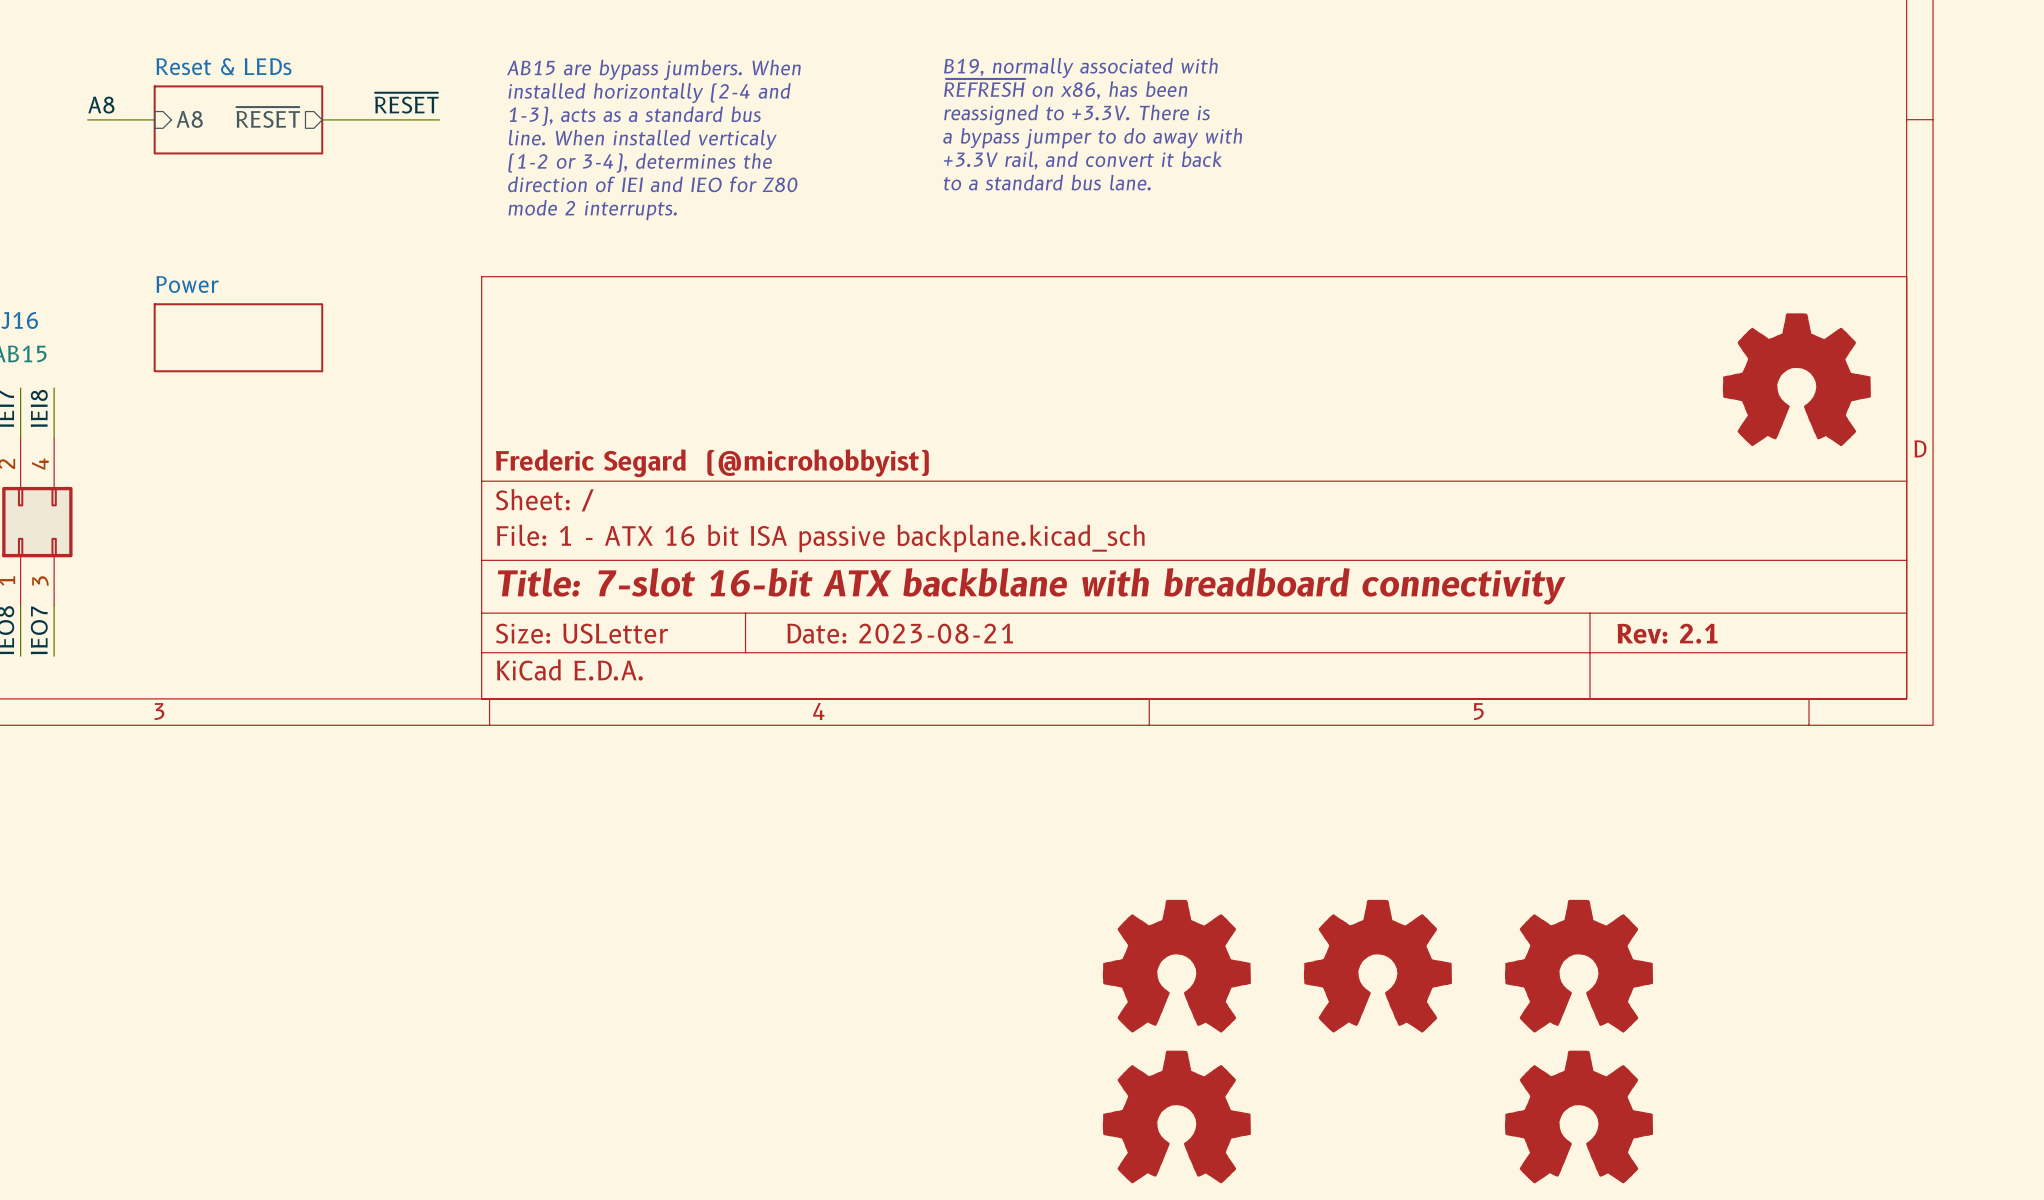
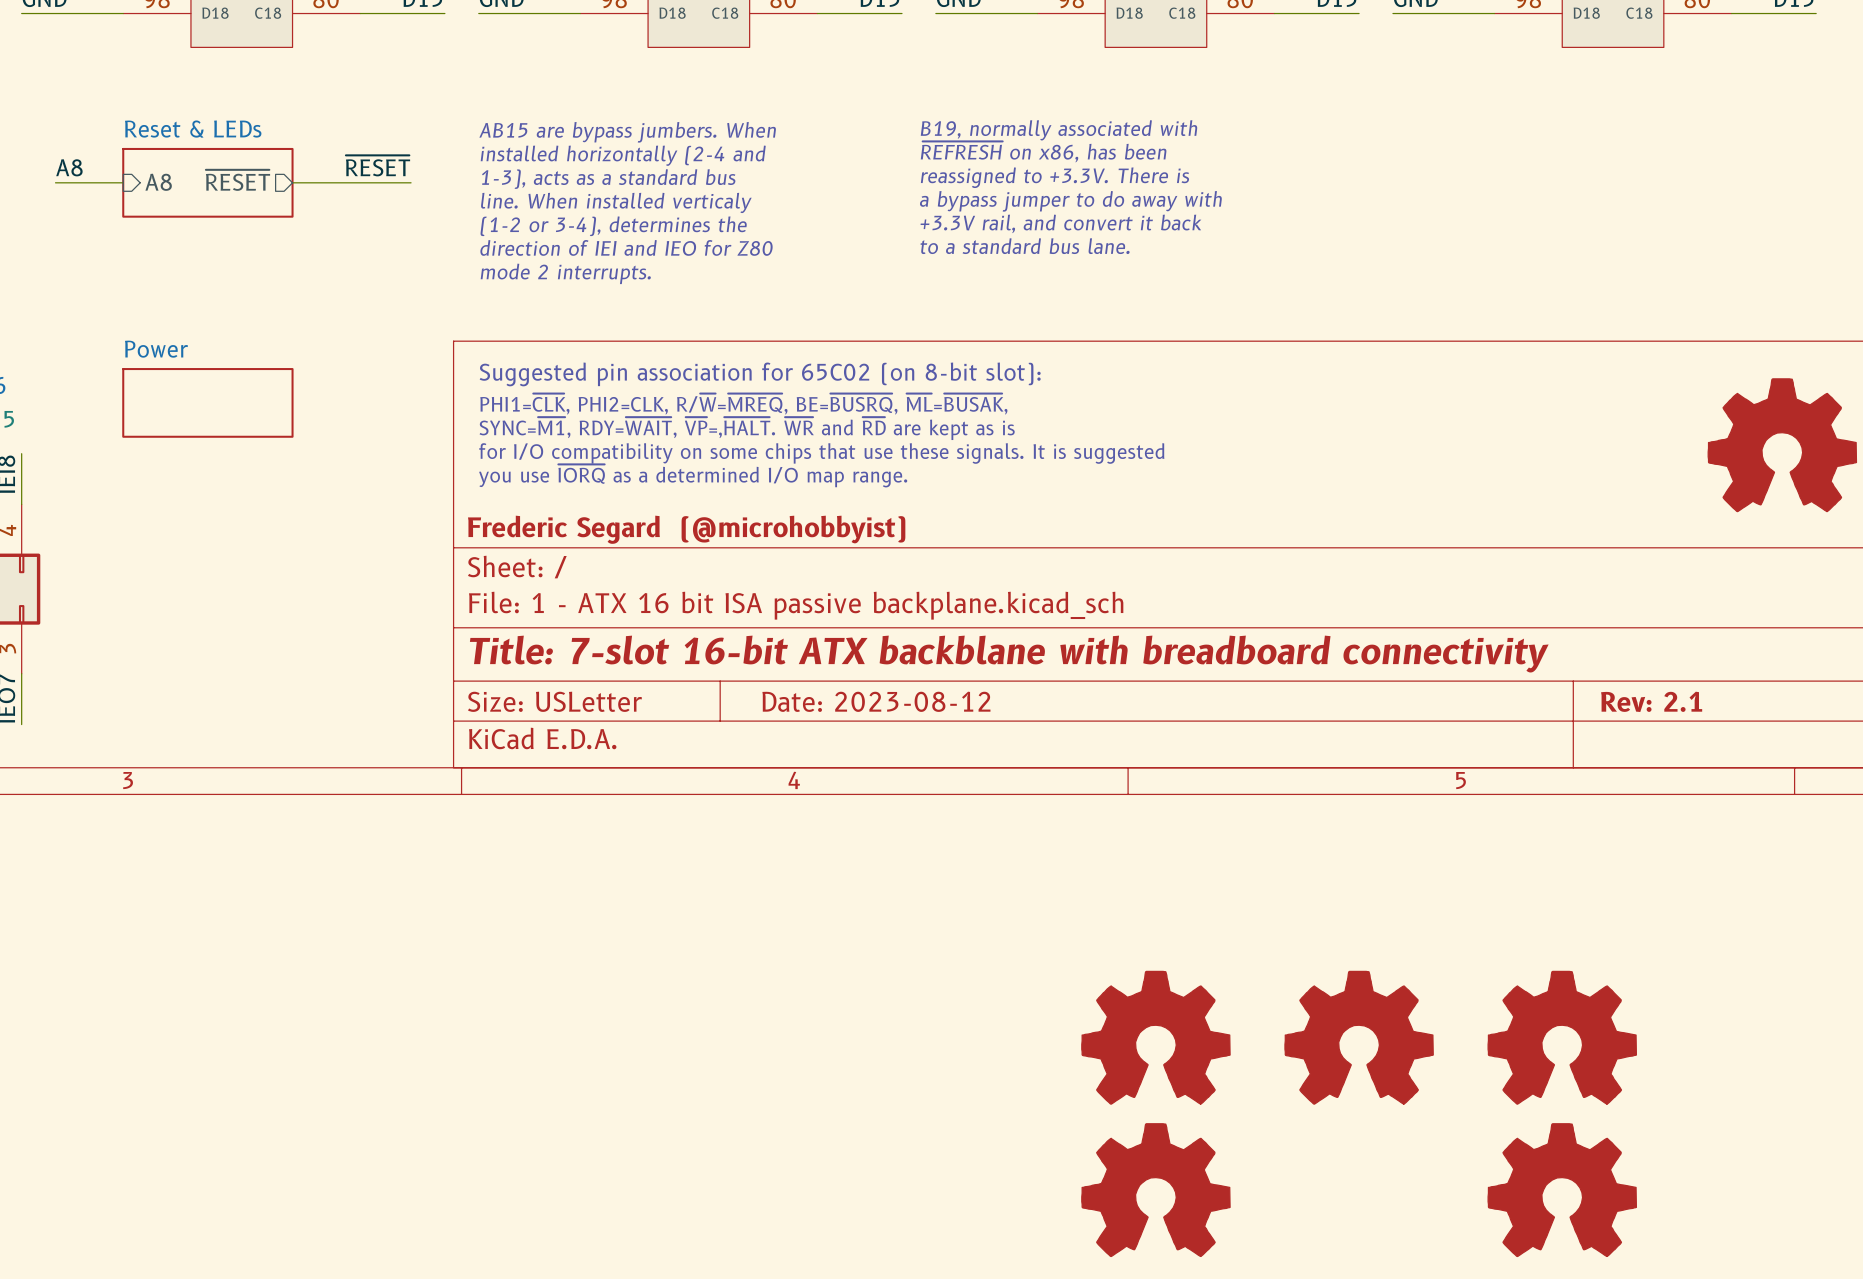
text: none -> Suggested pin association for 65C02 (on 8-bit slot): (760, 374)
text: none -> PHI1=~{CLK}, PHI2=CLK, R/~{W}=~{MREQ}, BE=~{BUSRQ}, ~{ML}=~{BUSAK}, (743, 404)
text: none -> SYNC=~{M1}, RDY=~{WAIT}, ~{VP}=,~{HALT}. ~{WR} and ~{RD} are kept as is (747, 428)
text: none -> for I/O compatibility on some chips that use these signals. It is suggested (821, 453)
text: none -> you use ~{IORQ} as a determined I/O map range. (693, 475)
title block: Date: 2023-08-21 (900, 633) -> Date: 2023-08-12 (876, 701)

